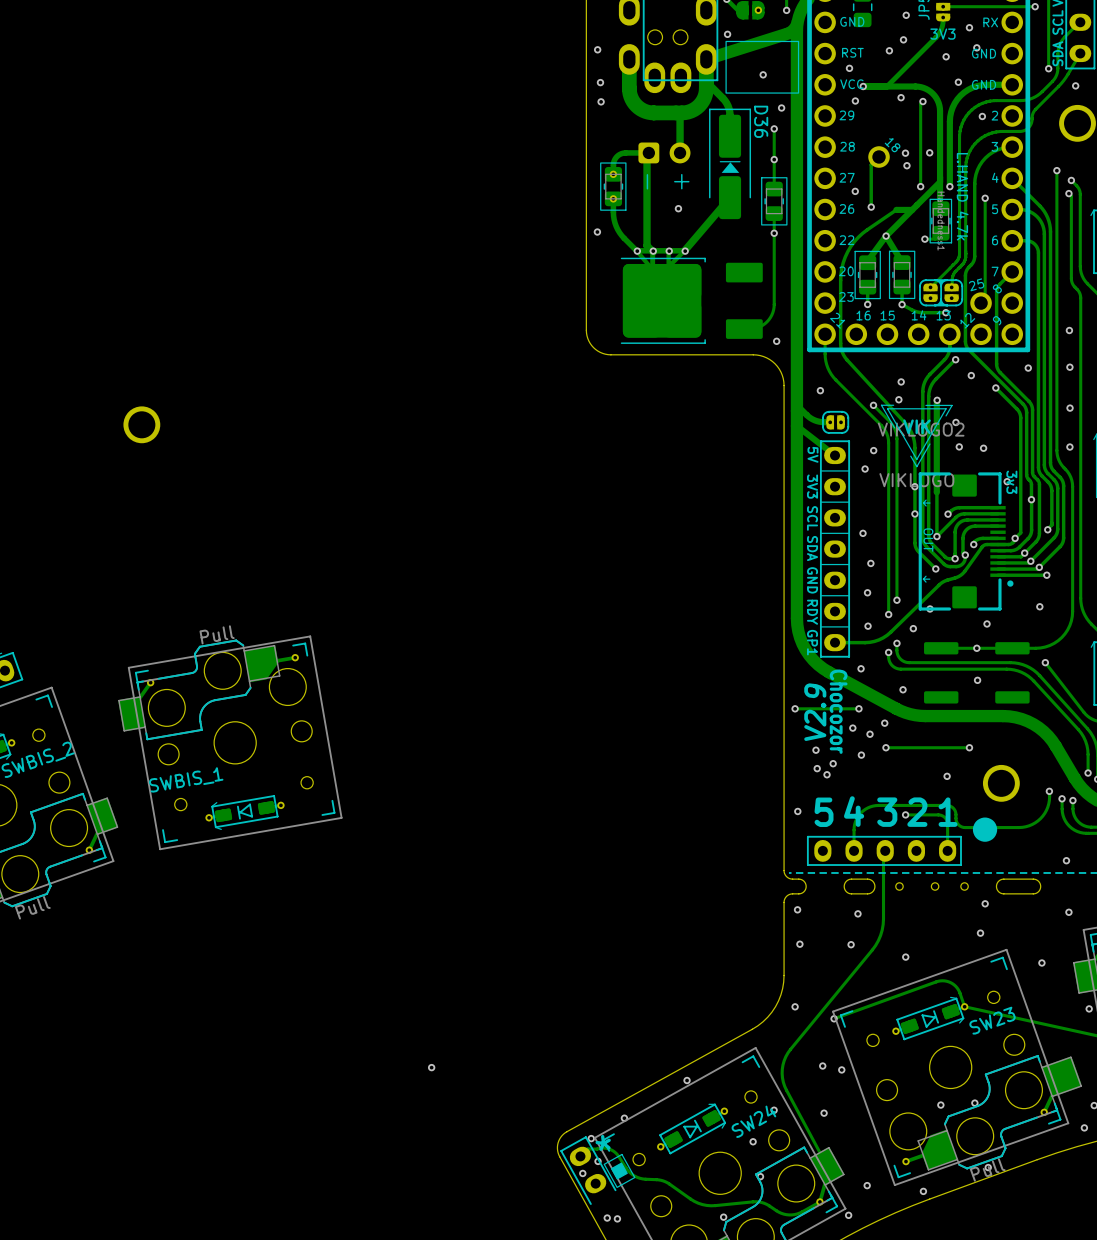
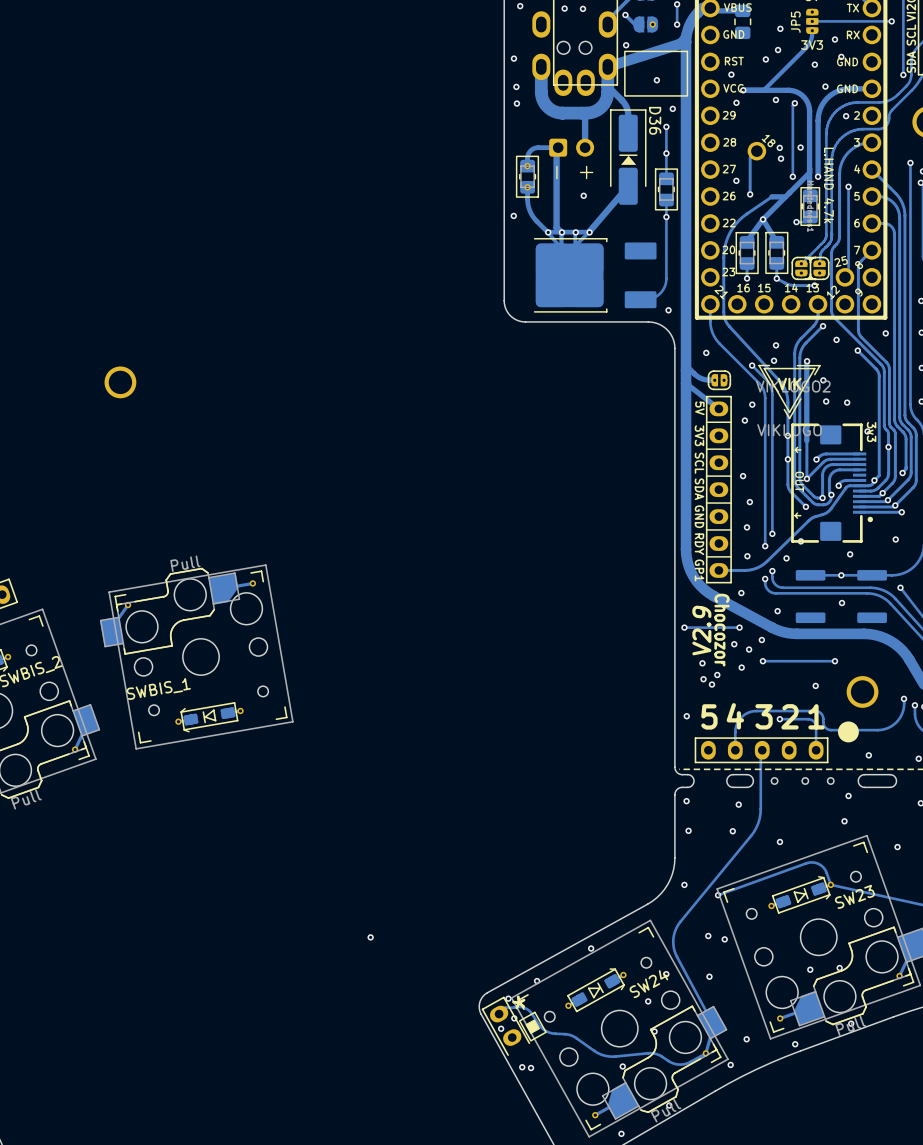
via: none -> (868, 755)

